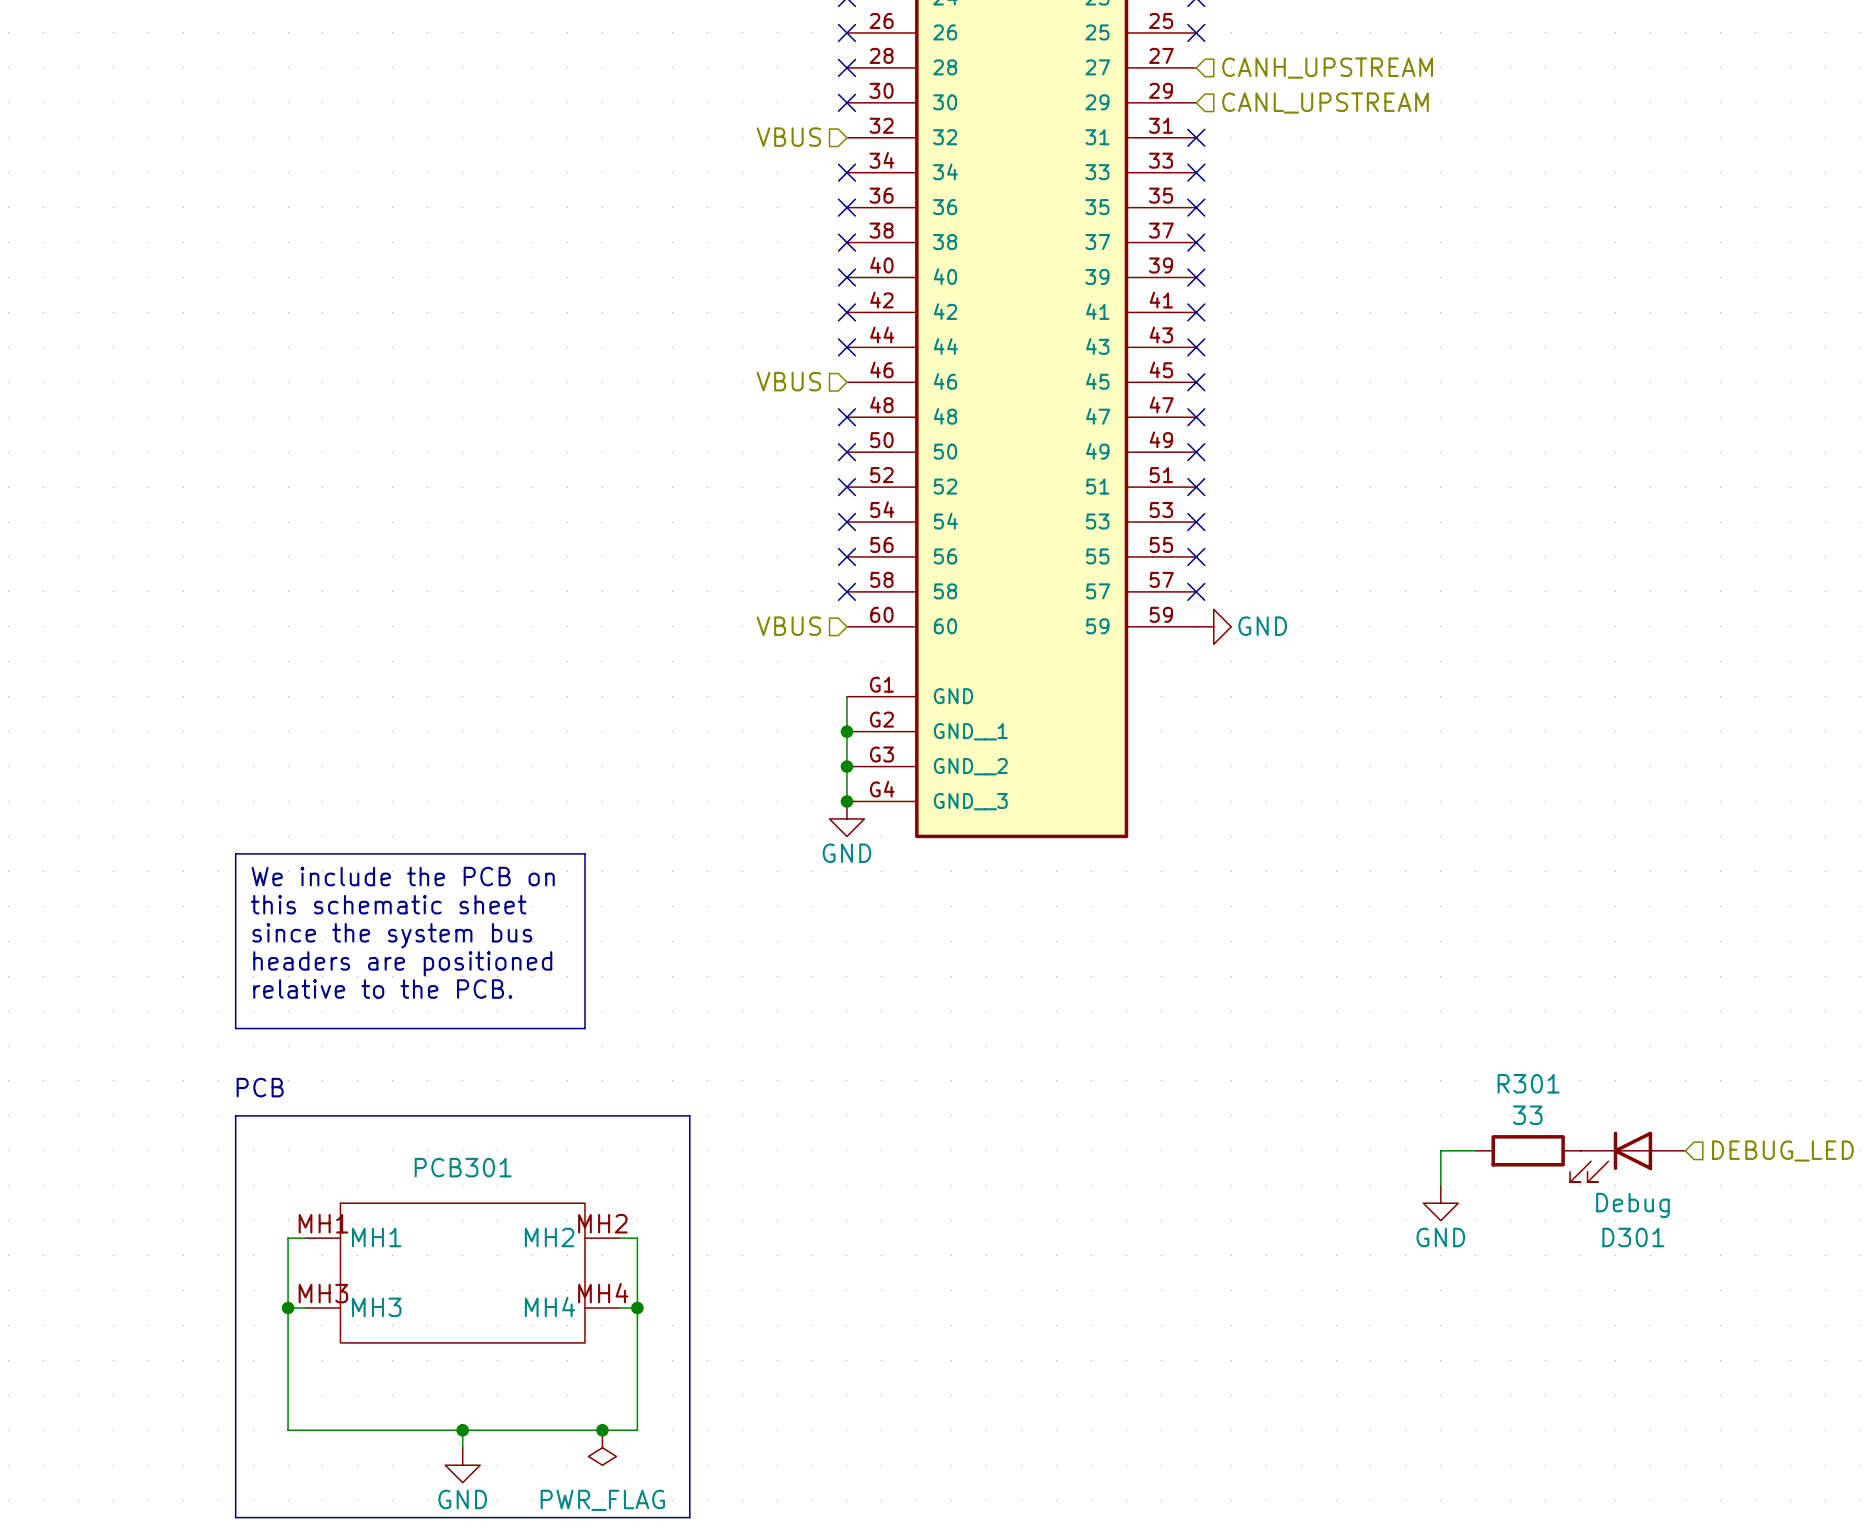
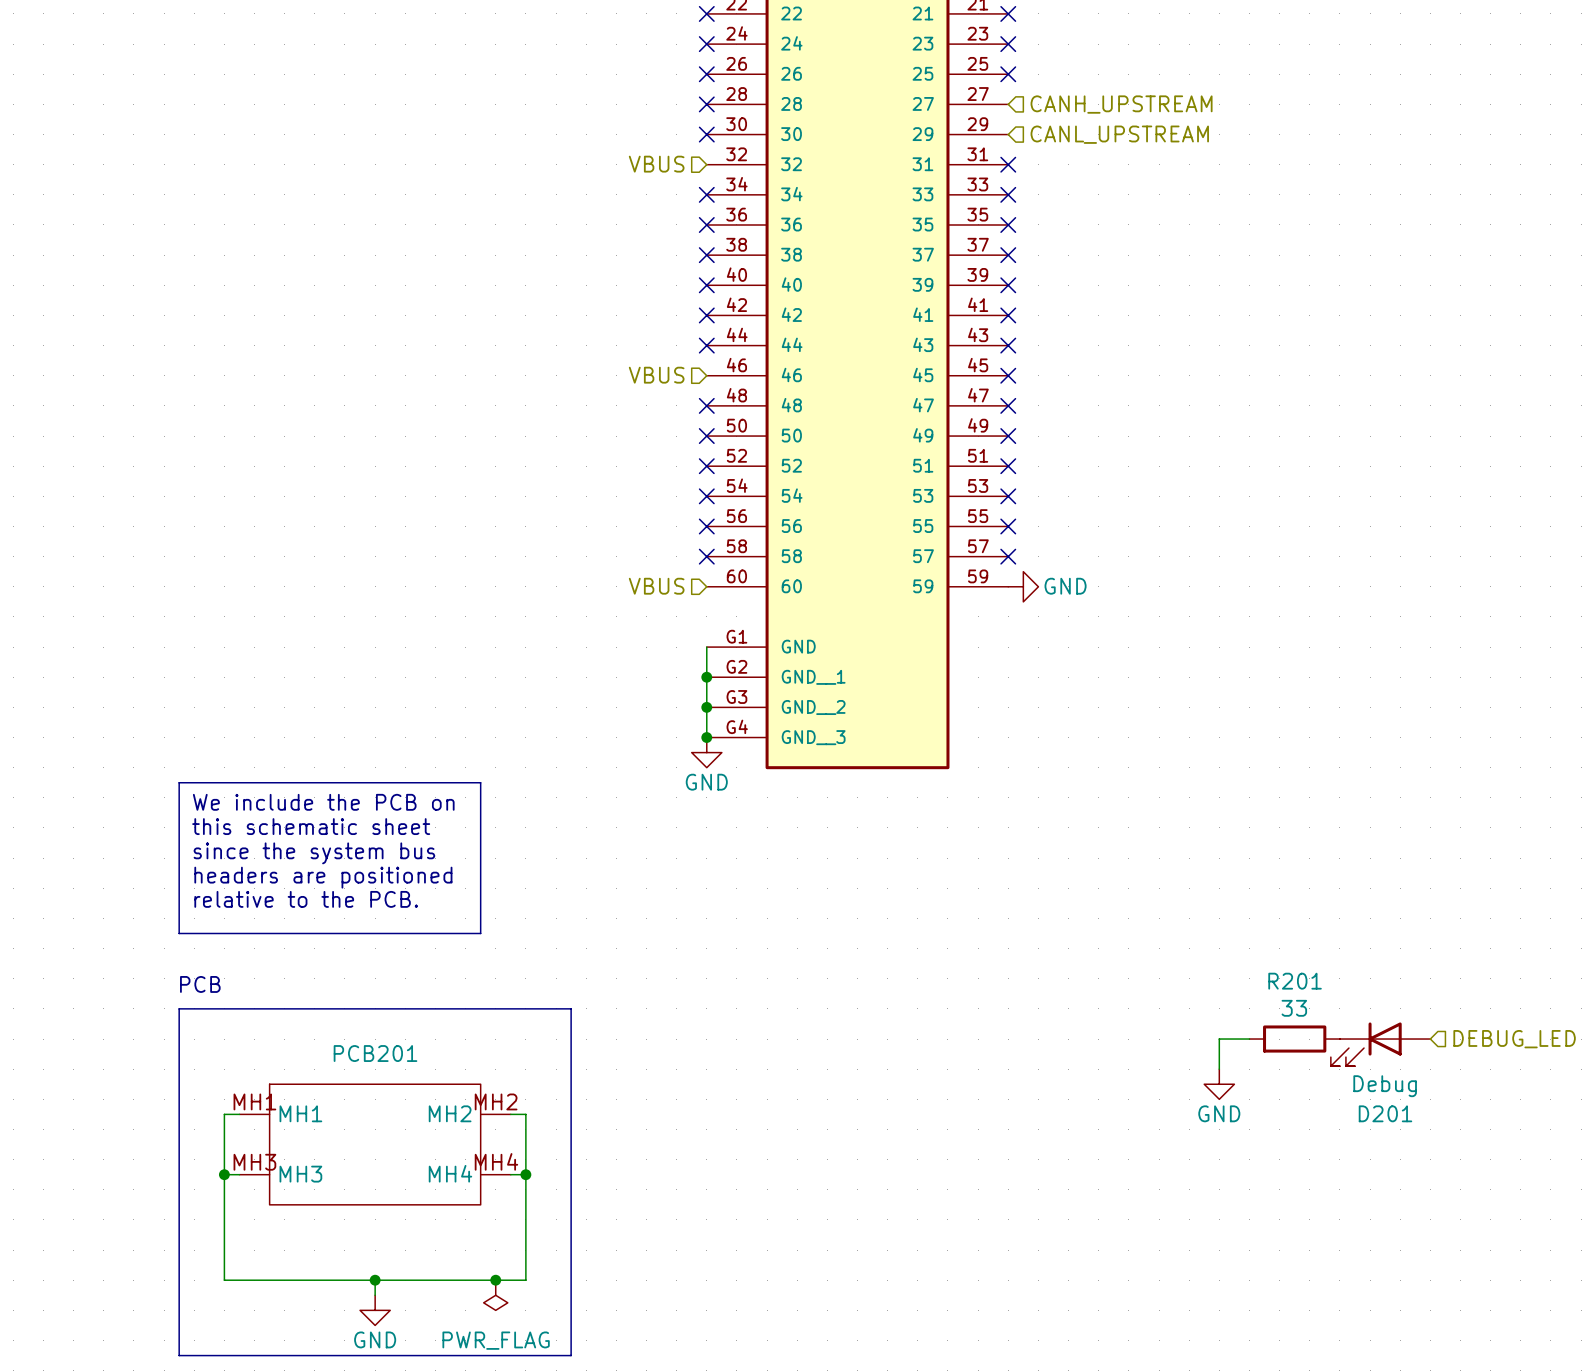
R301 name: R301 (1528, 1083) -> R201 (1295, 981)
PCB301 name: PCB301 (463, 1167) -> PCB201 (375, 1053)
D301 name: D301 (1633, 1237) -> D201 (1385, 1113)

